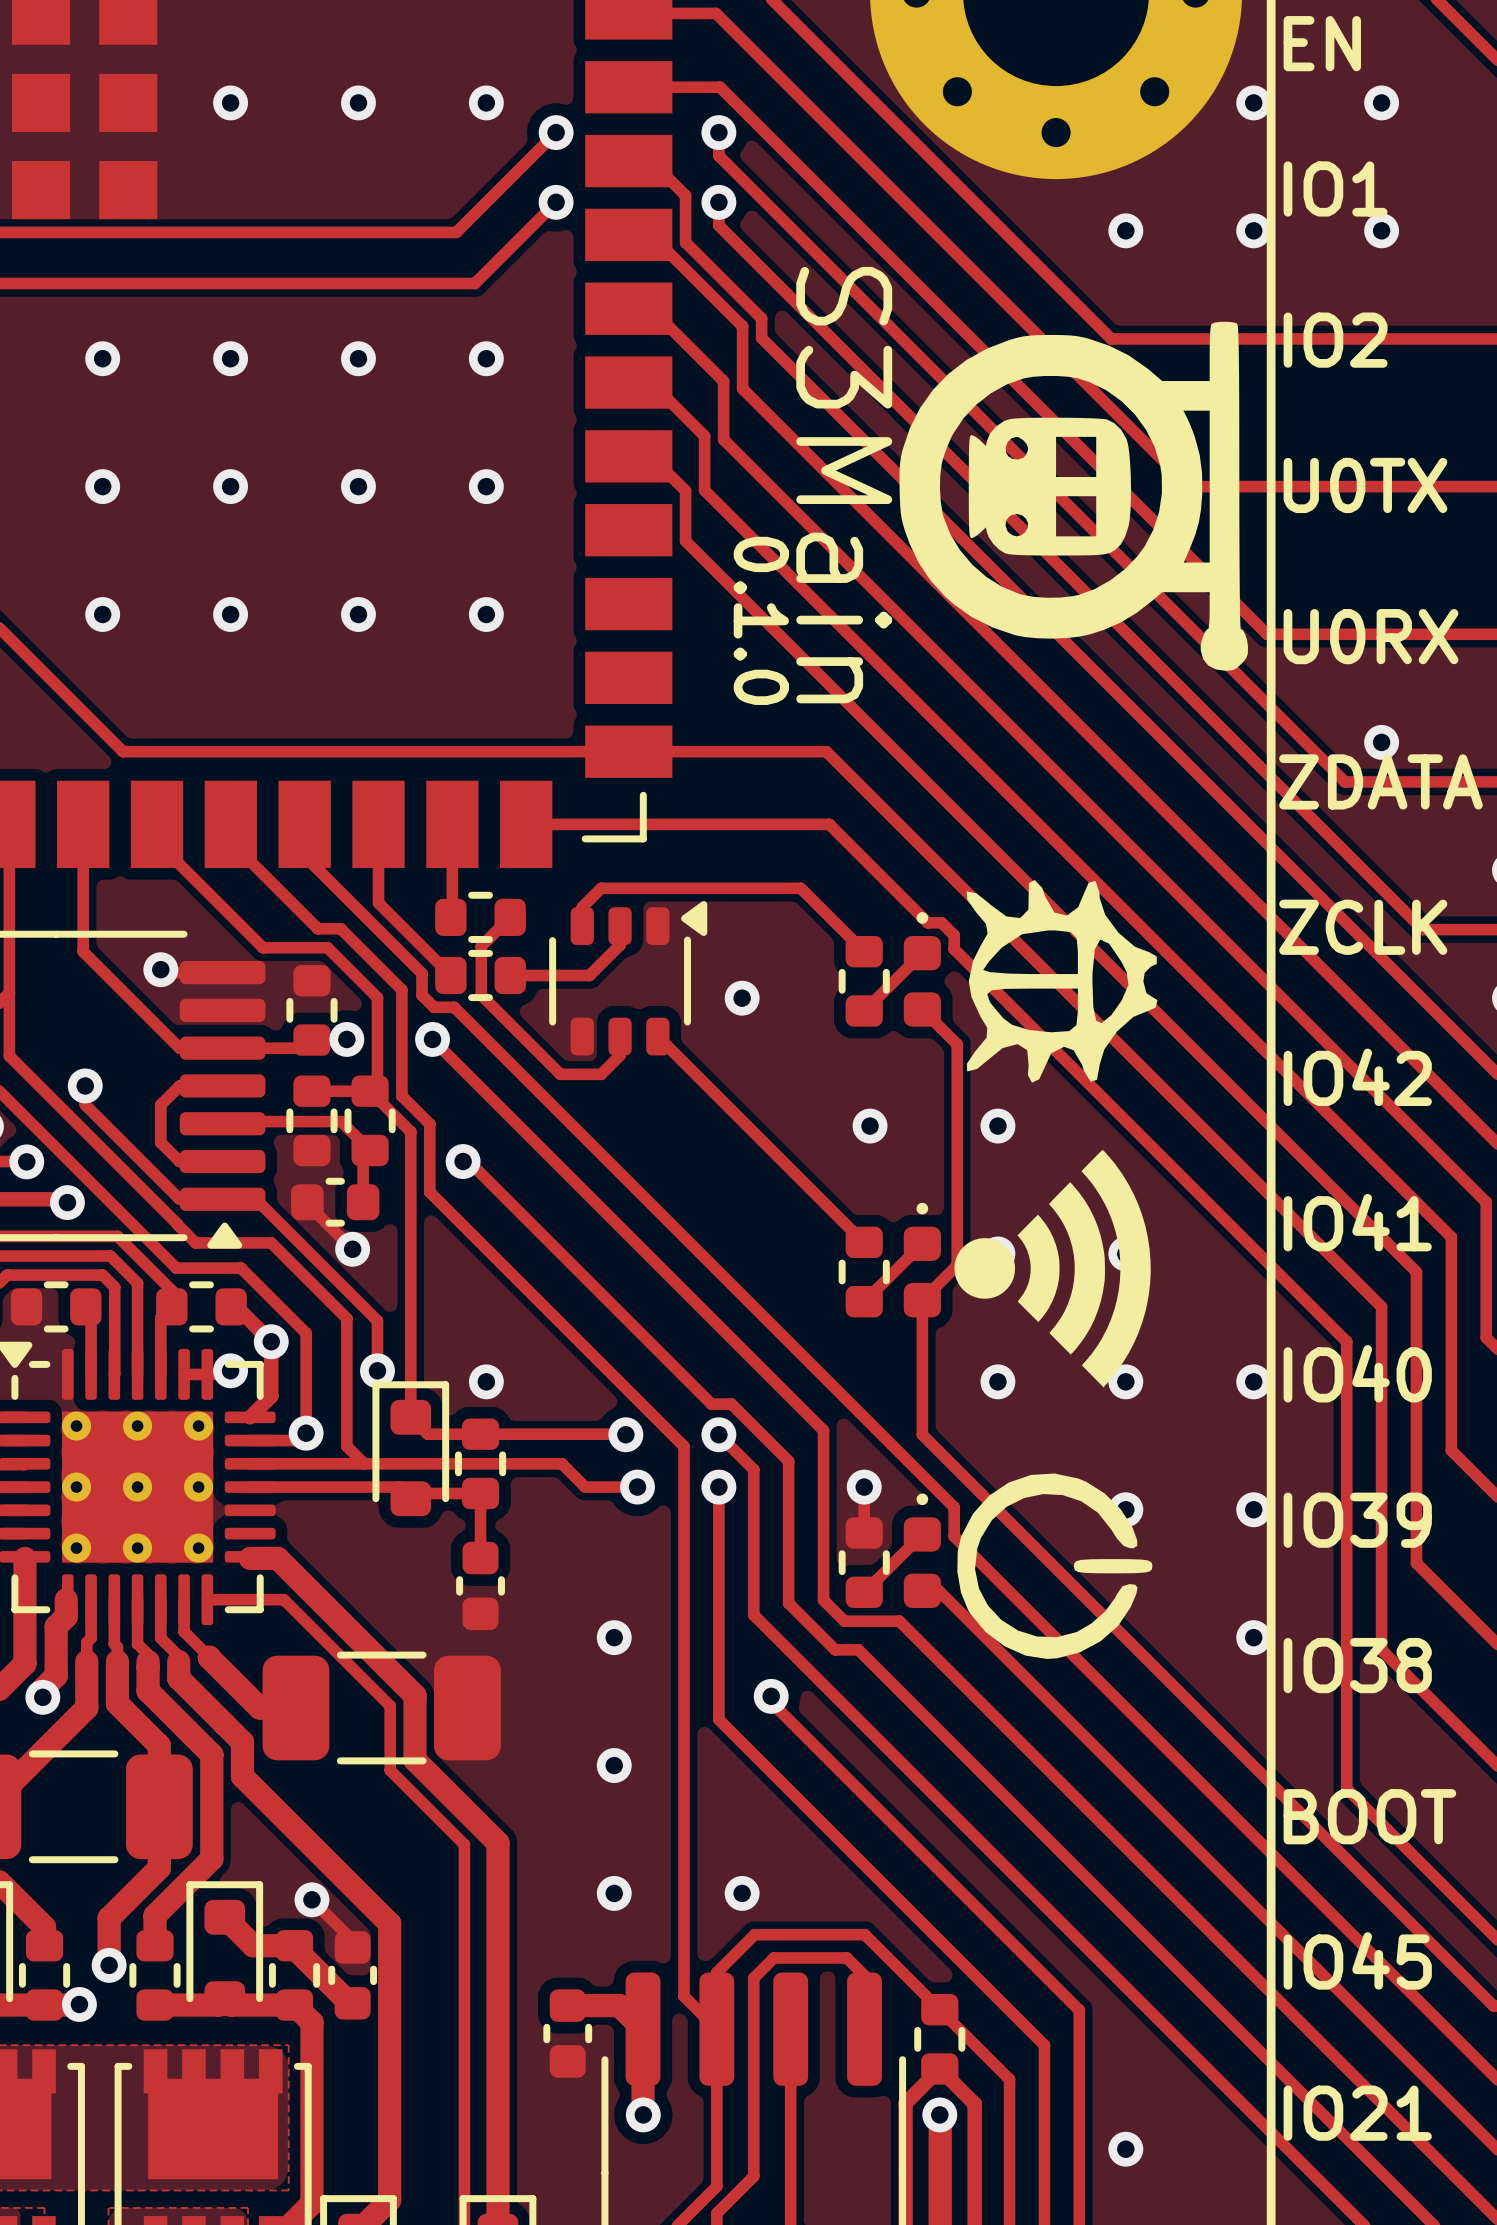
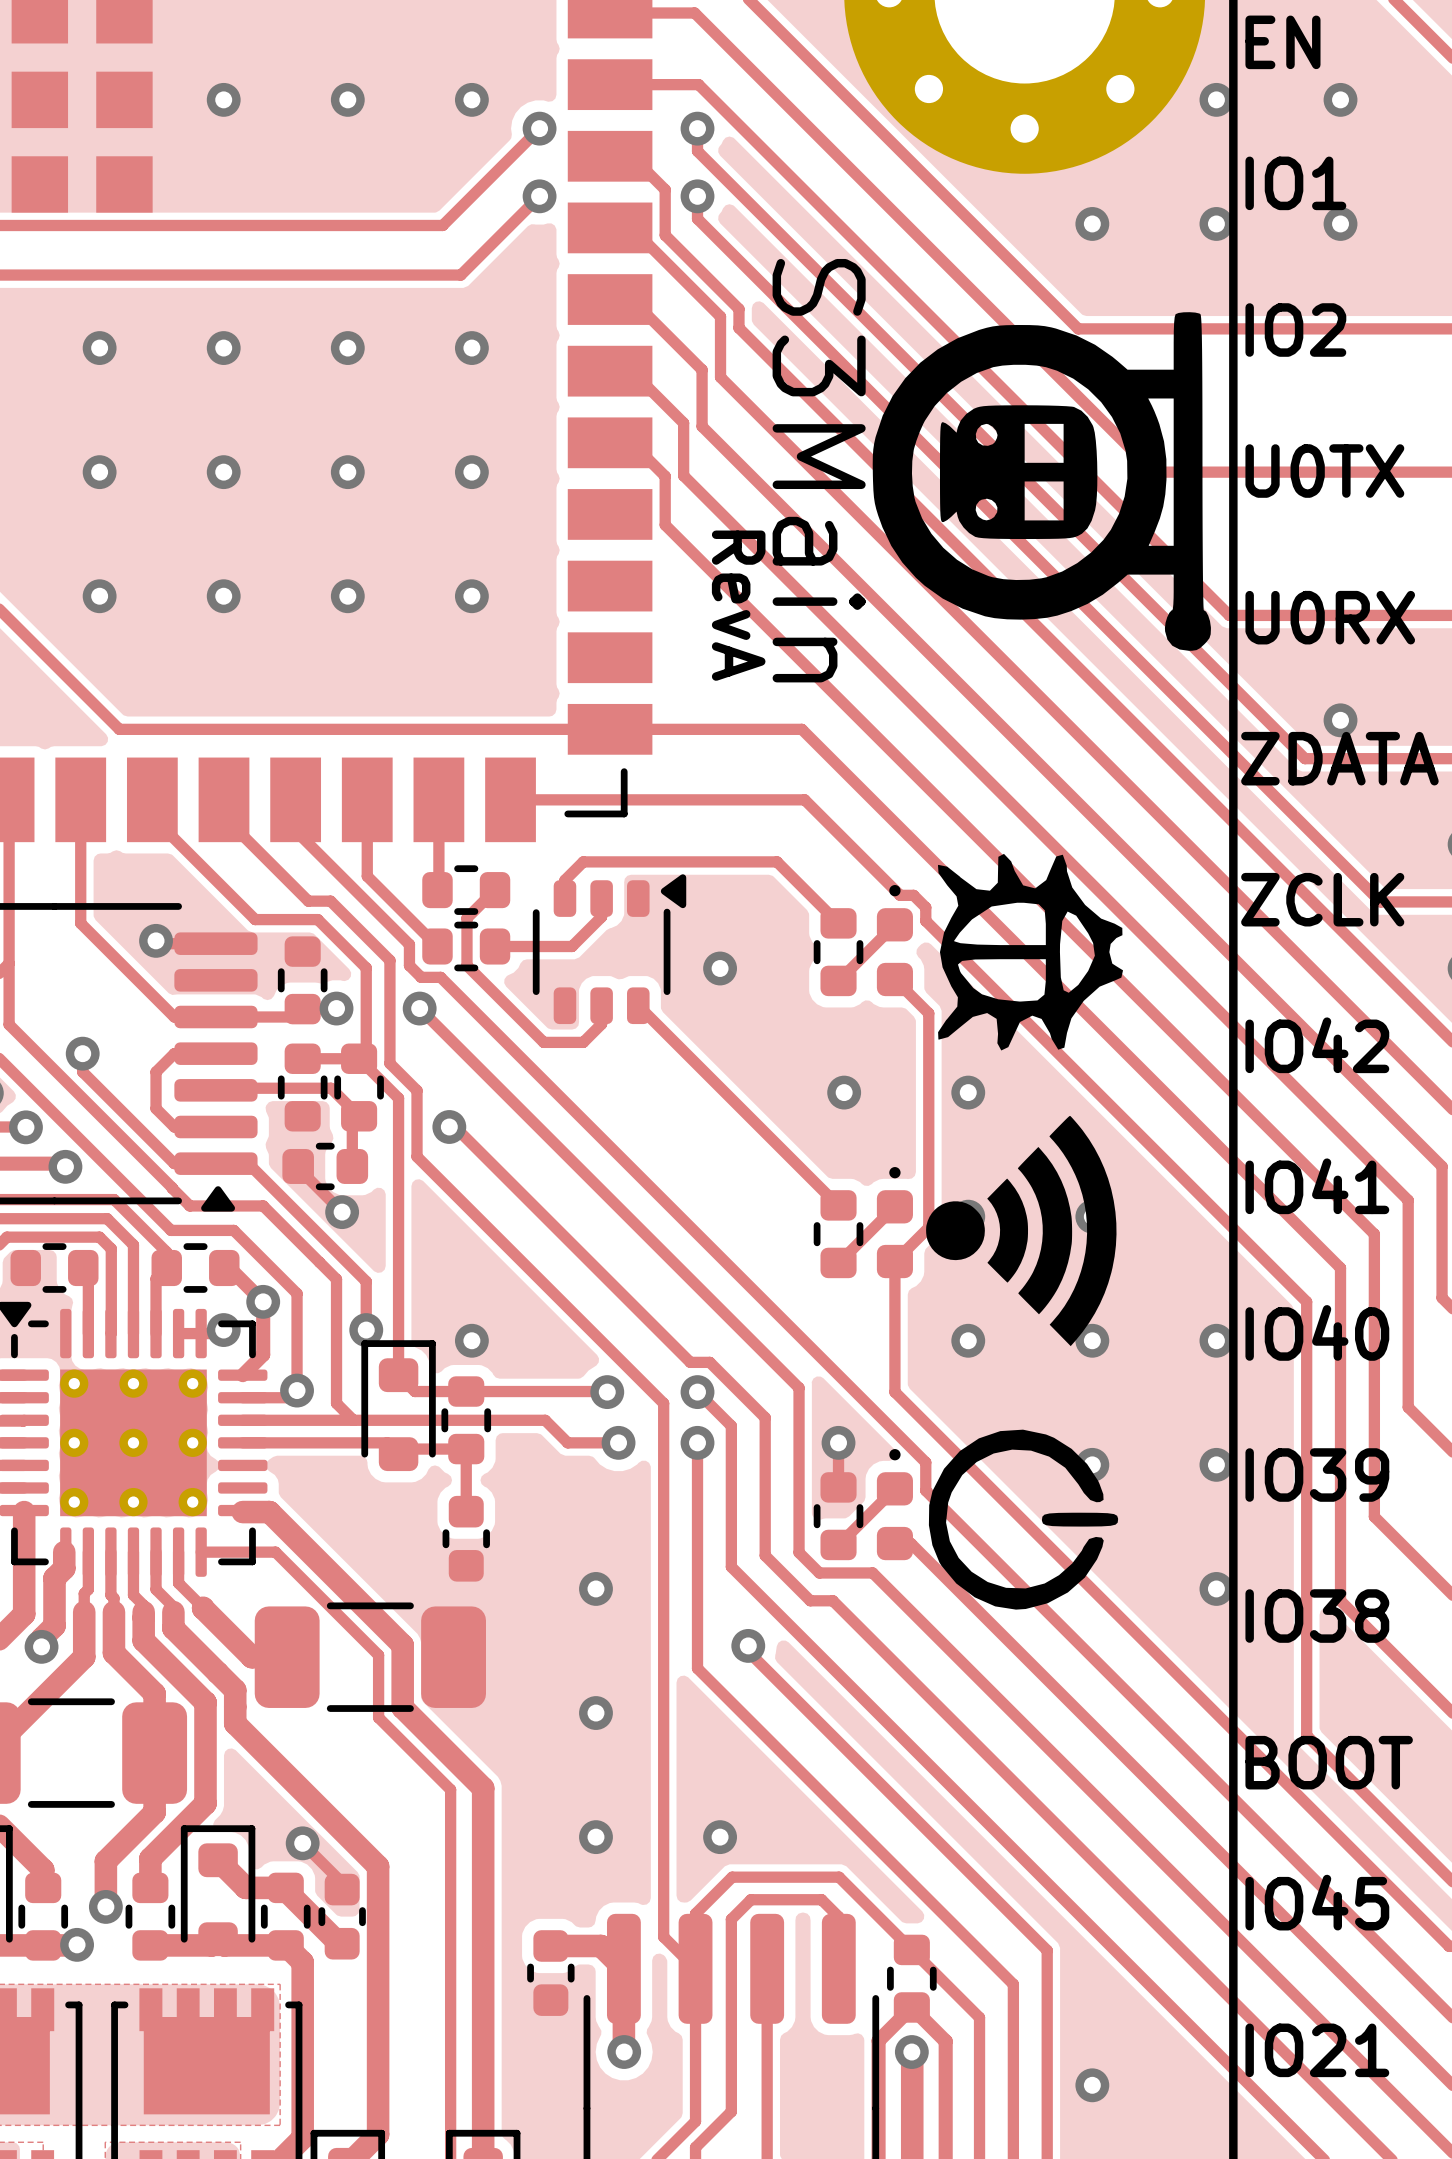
text: 0.1.0 (761, 620) -> RevA (738, 605)

